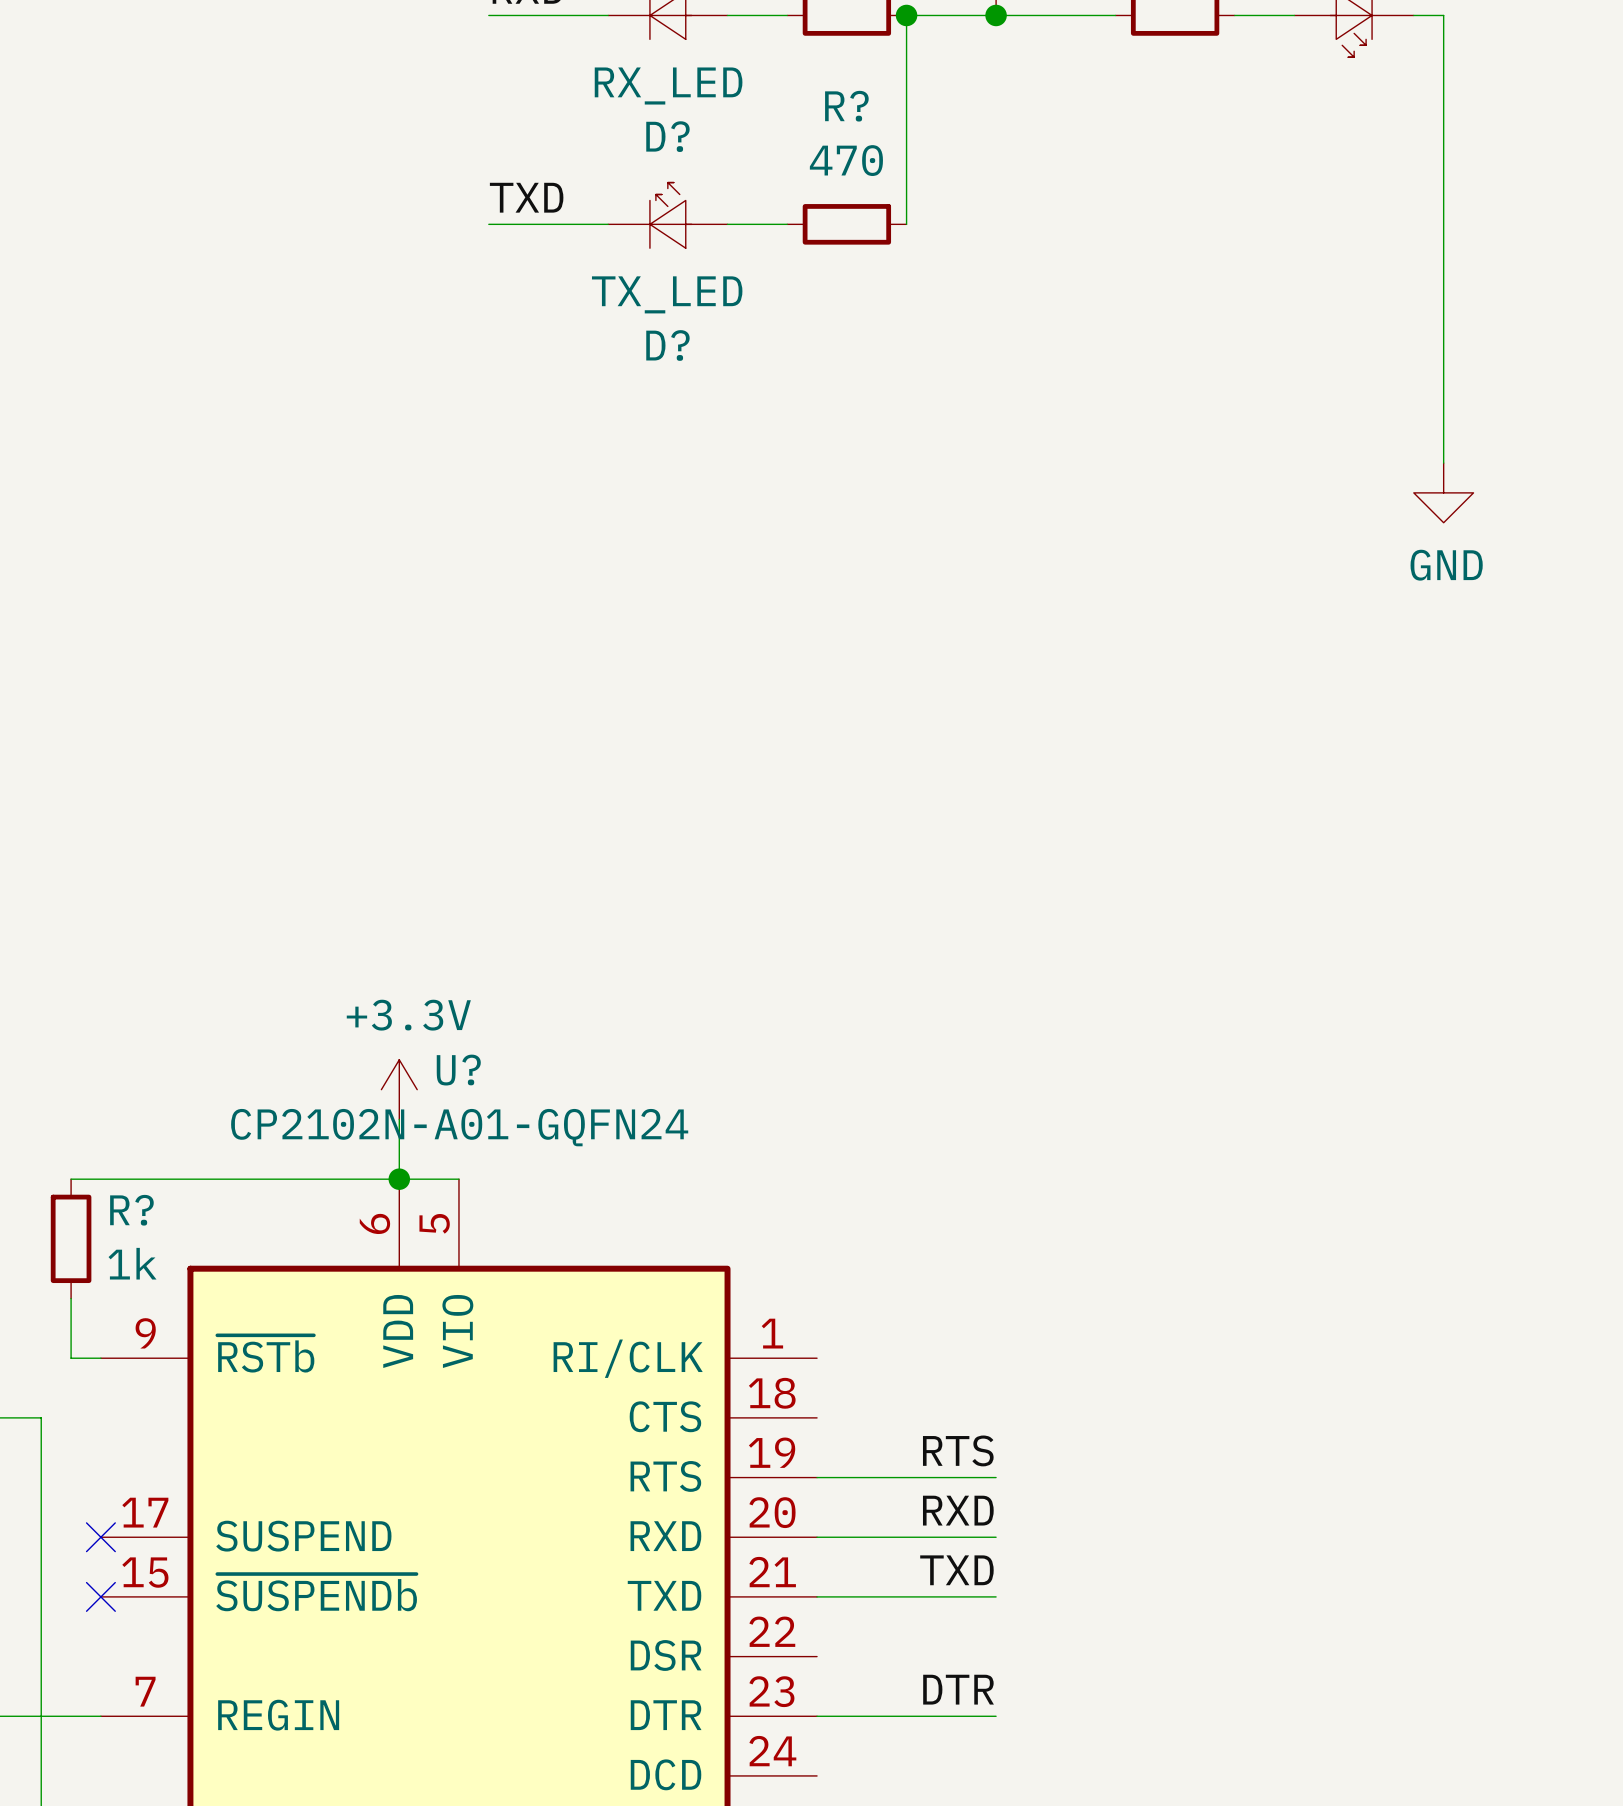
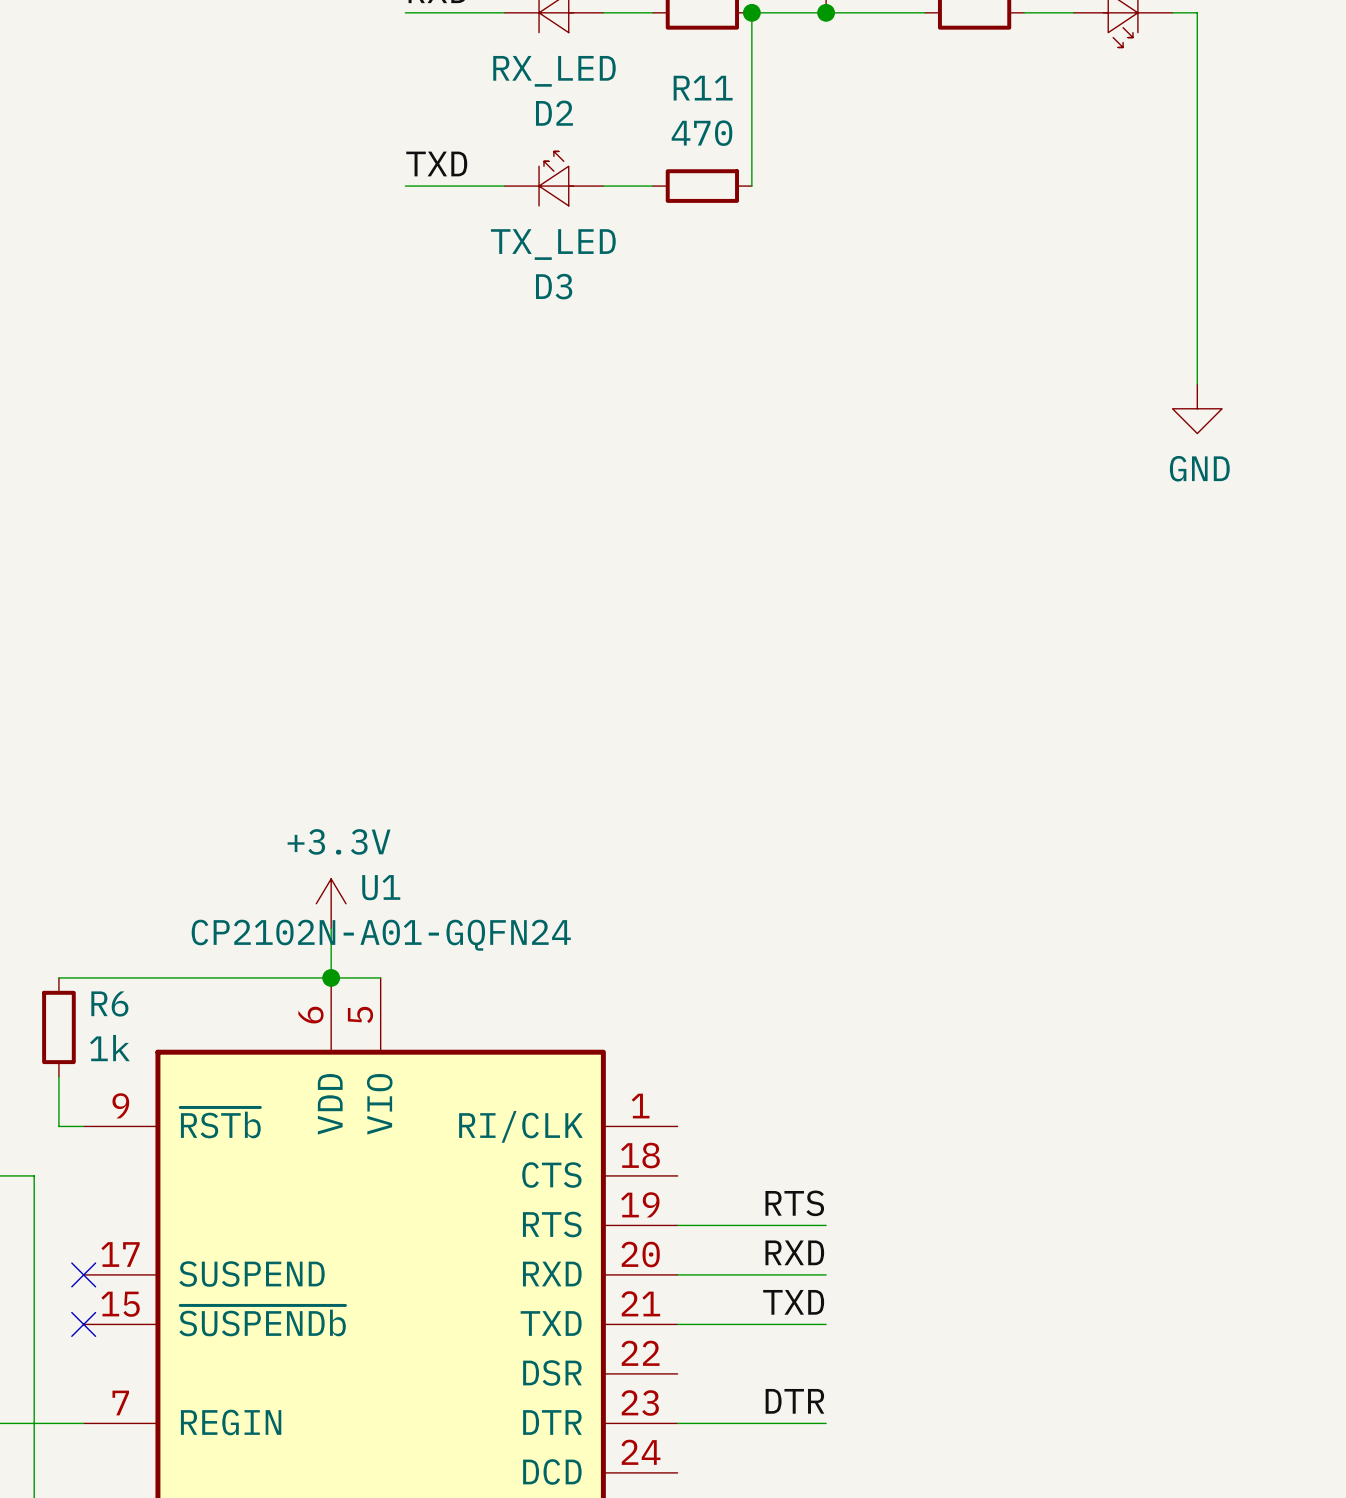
R? name: R? (846, 106) -> R11 (703, 88)
D? name: D? (667, 136) -> D2 (554, 113)
D? name: D? (667, 345) -> D3 (554, 286)
U? name: U? (458, 1070) -> U1 (381, 887)
R? name: R? (131, 1210) -> R6 (109, 1003)

